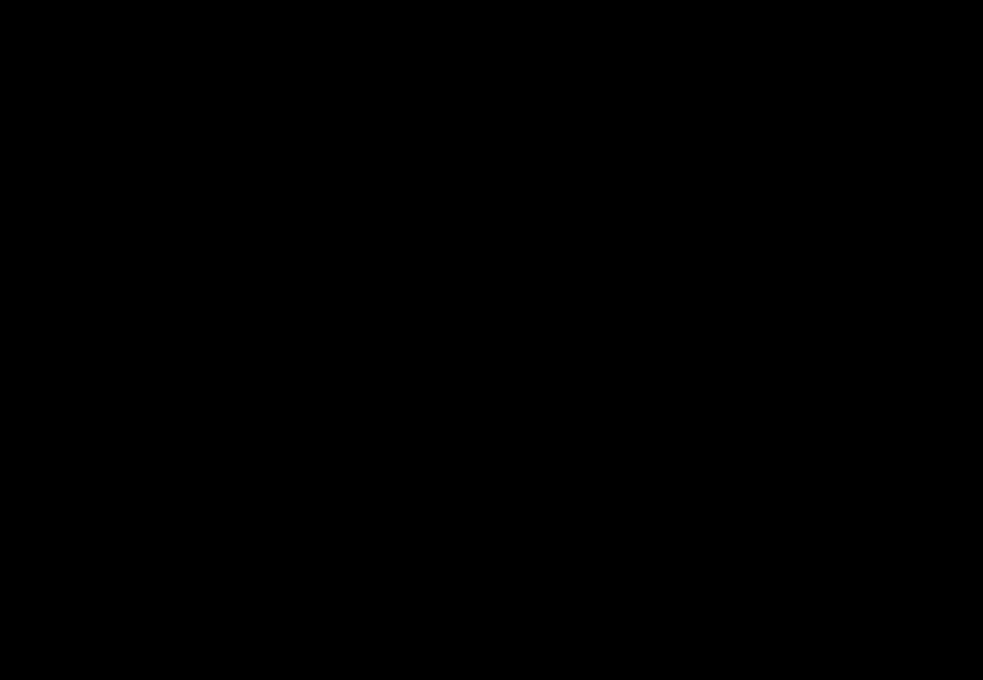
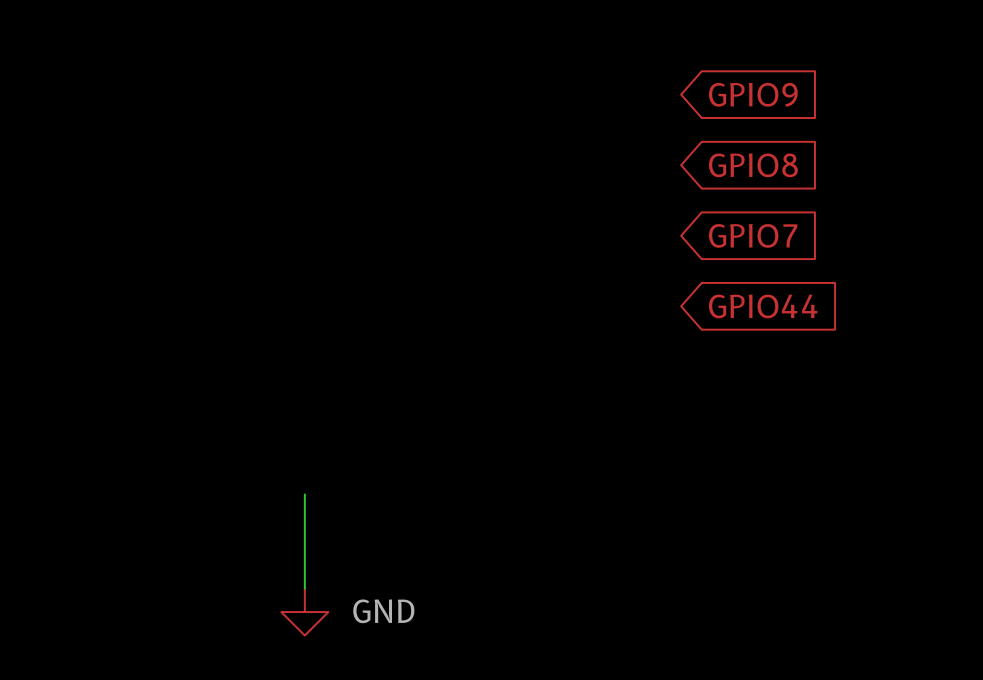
global label: none -> GPIO9 (753, 94)
global label: none -> GPIO8 (753, 165)
global label: none -> GPIO7 (753, 235)
global label: none -> GPIO44 (763, 306)
wire: none -> (304, 494) (304, 588)
power symbol: none -> GND (304, 612)

